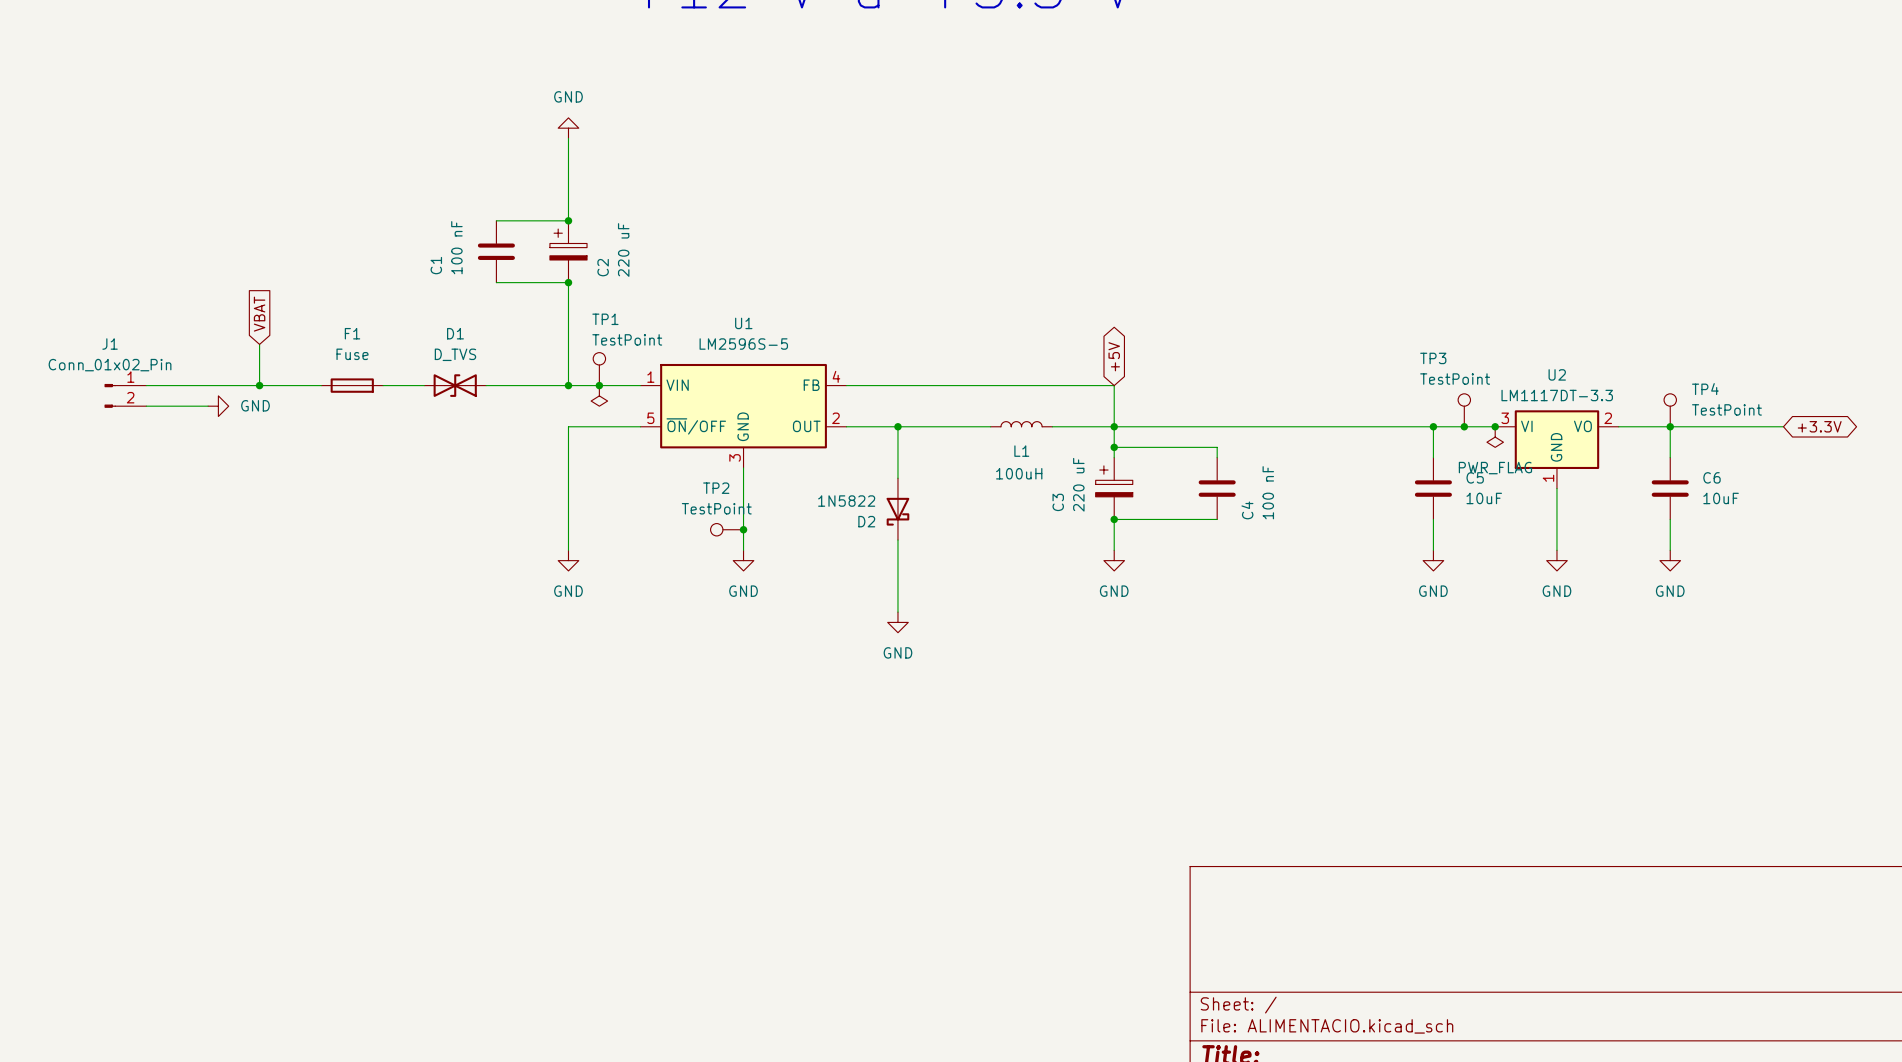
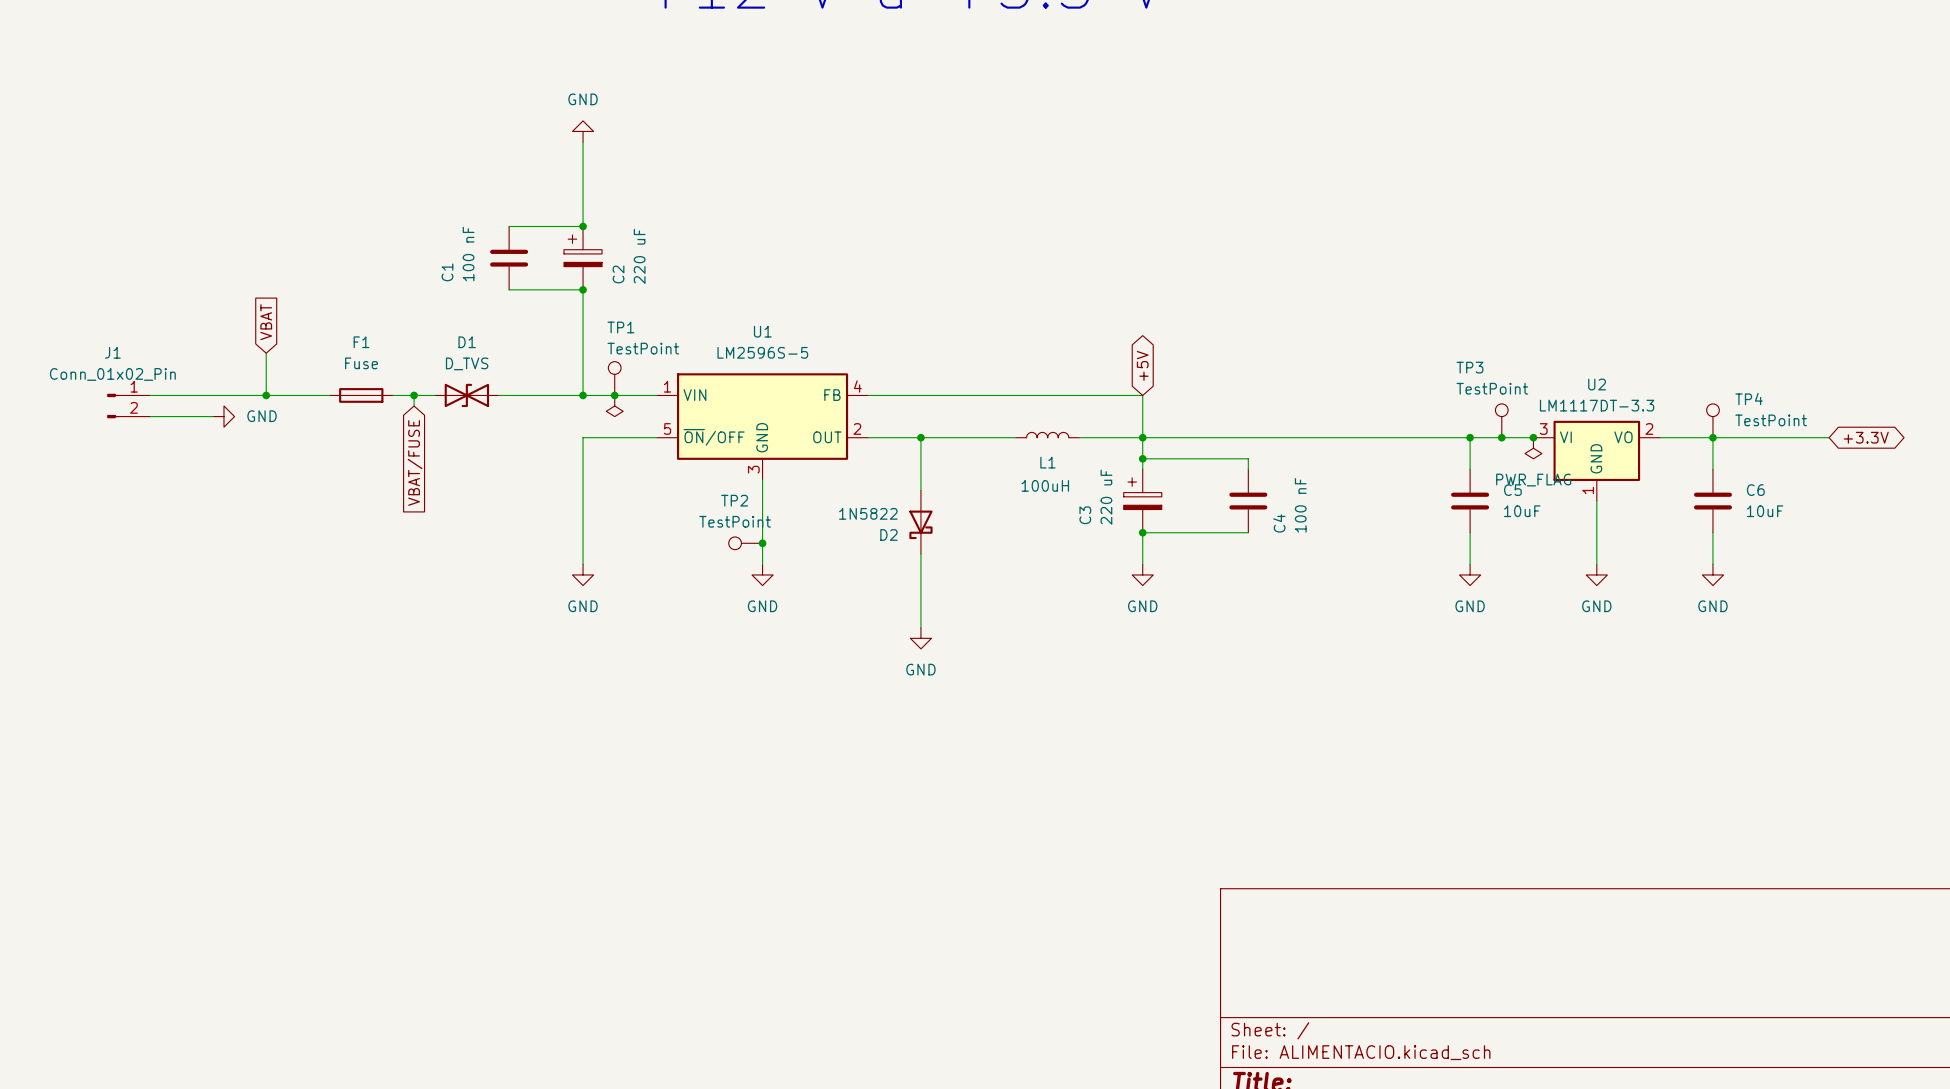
wire: none -> (414, 395) (414, 406)
junction: none -> (414, 395)
global label: none -> VBAT/FUSE (415, 462)

